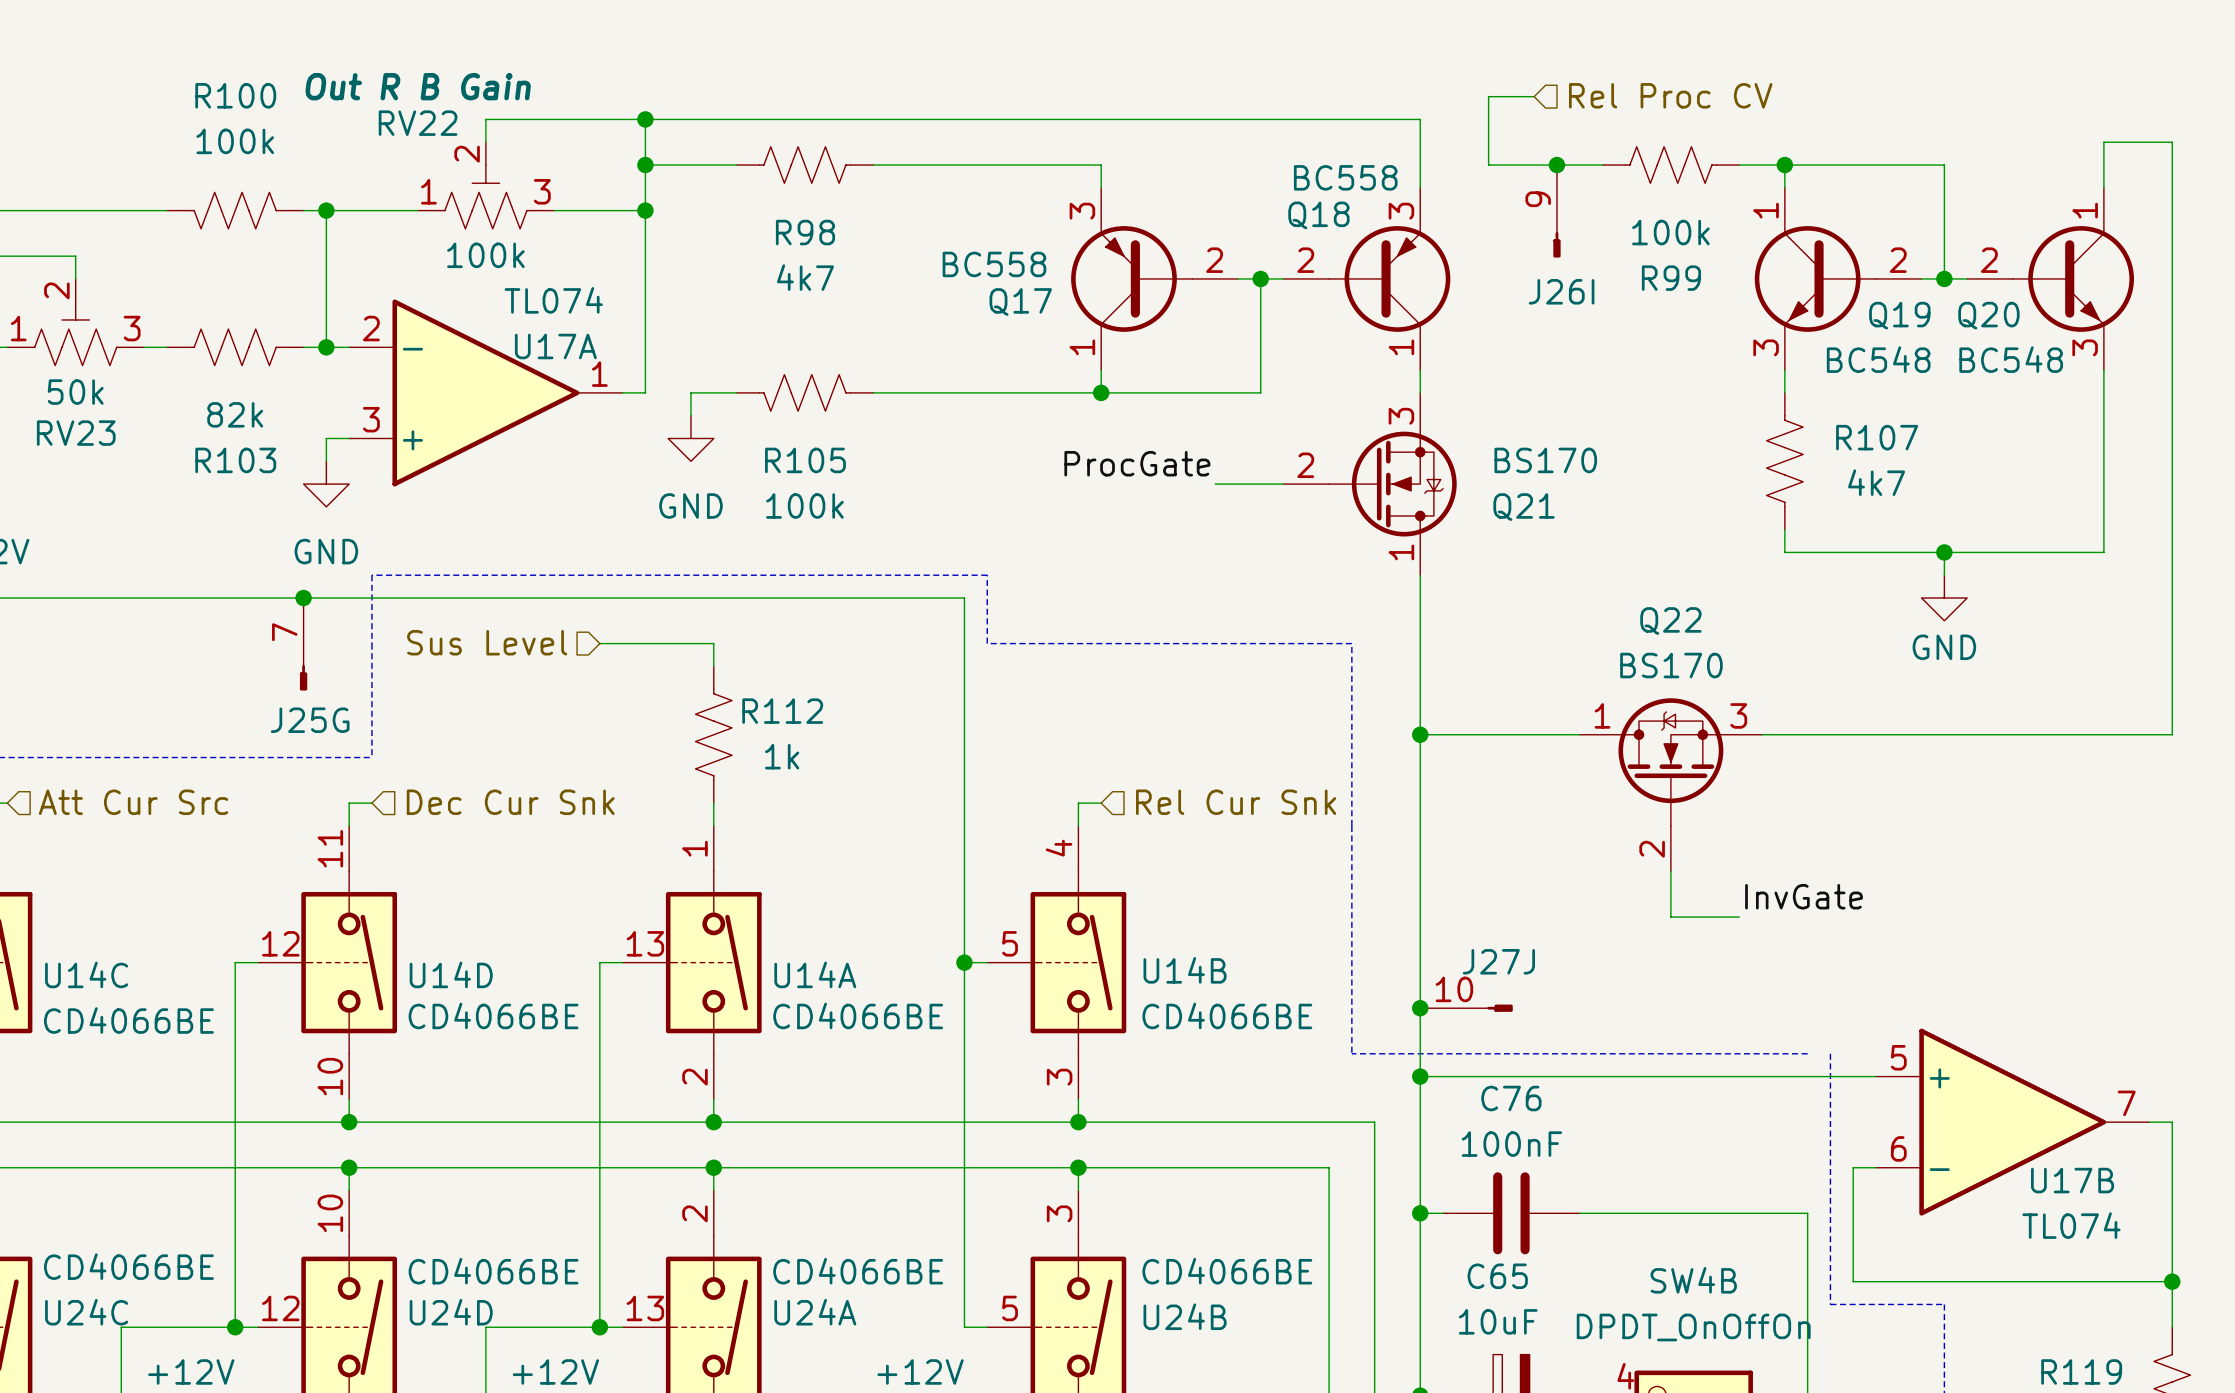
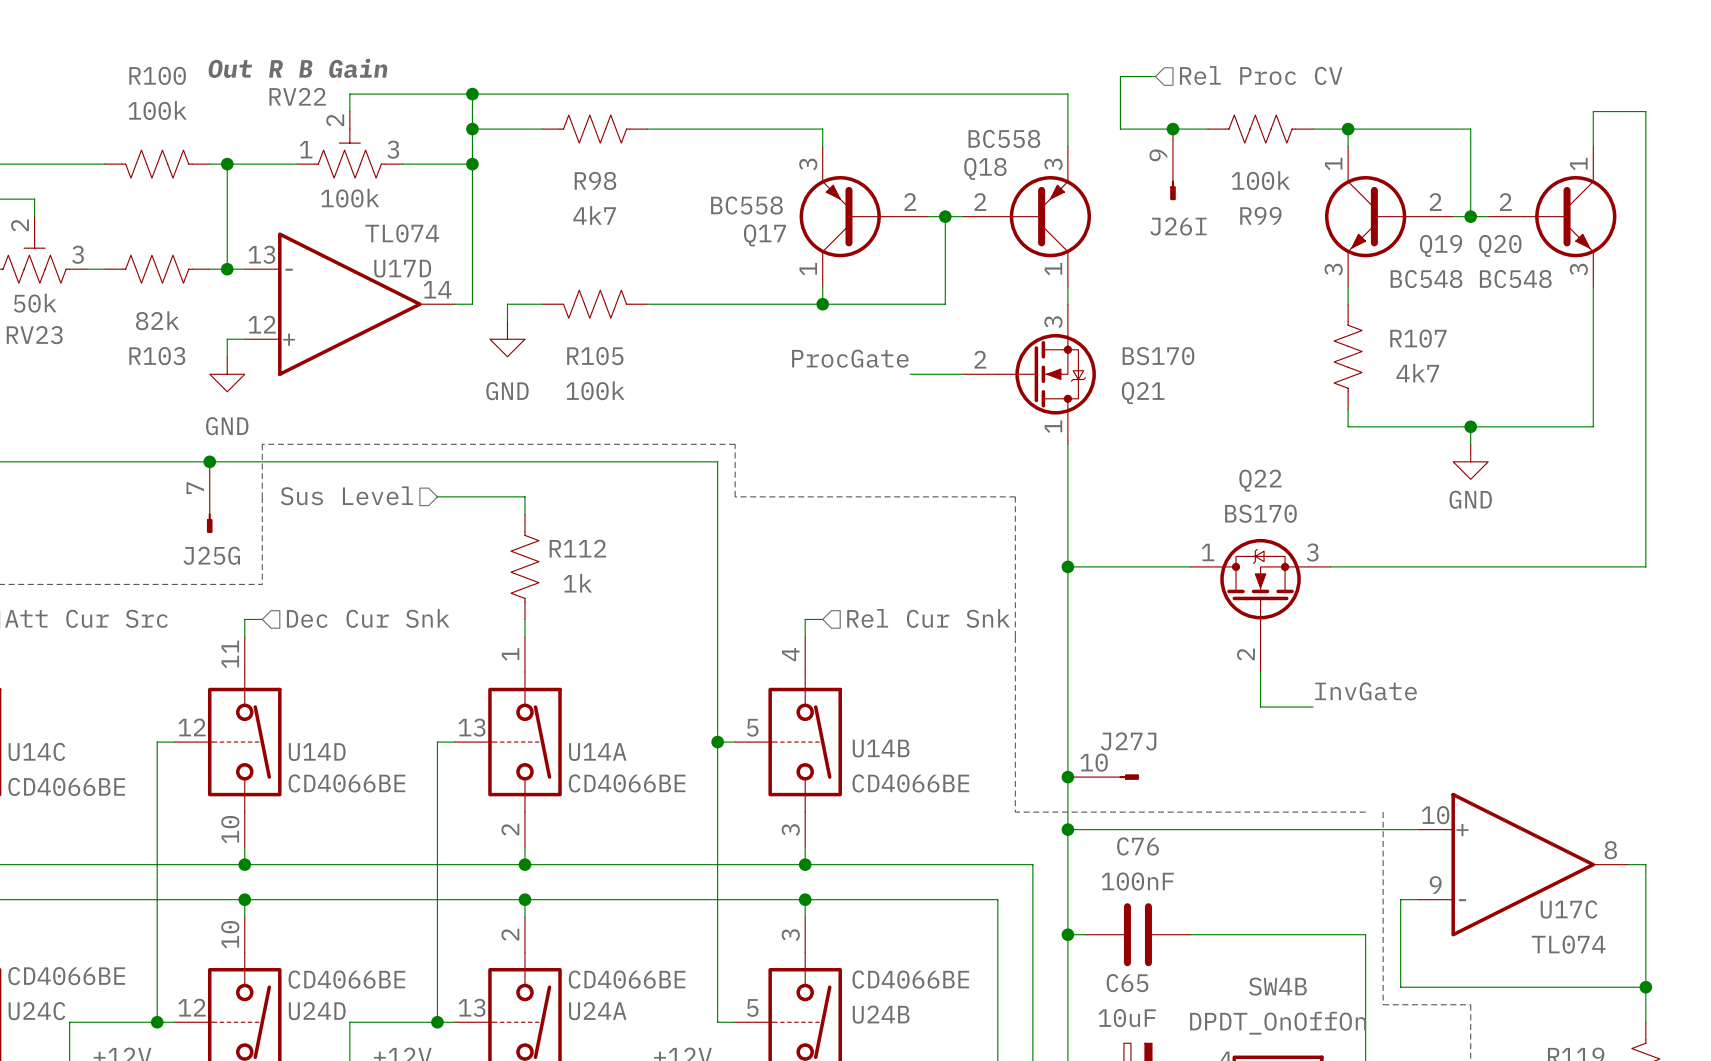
U17A pin number: 2 (371, 328) -> 13 (261, 254)
U17A name: U17A (555, 346) -> U17D (402, 268)
U17A pin number: 1 (599, 374) -> 14 (437, 289)
U17A pin number: 3 (371, 419) -> 12 (262, 324)
U17B pin number: 5 (1898, 1057) -> 10 (1435, 815)
U17B pin number: 7 (2126, 1103) -> 8 (1610, 850)
U17B pin number: 6 (1898, 1148) -> 9 (1435, 885)
U17B name: U17B (2072, 1180) -> U17C (1569, 909)

